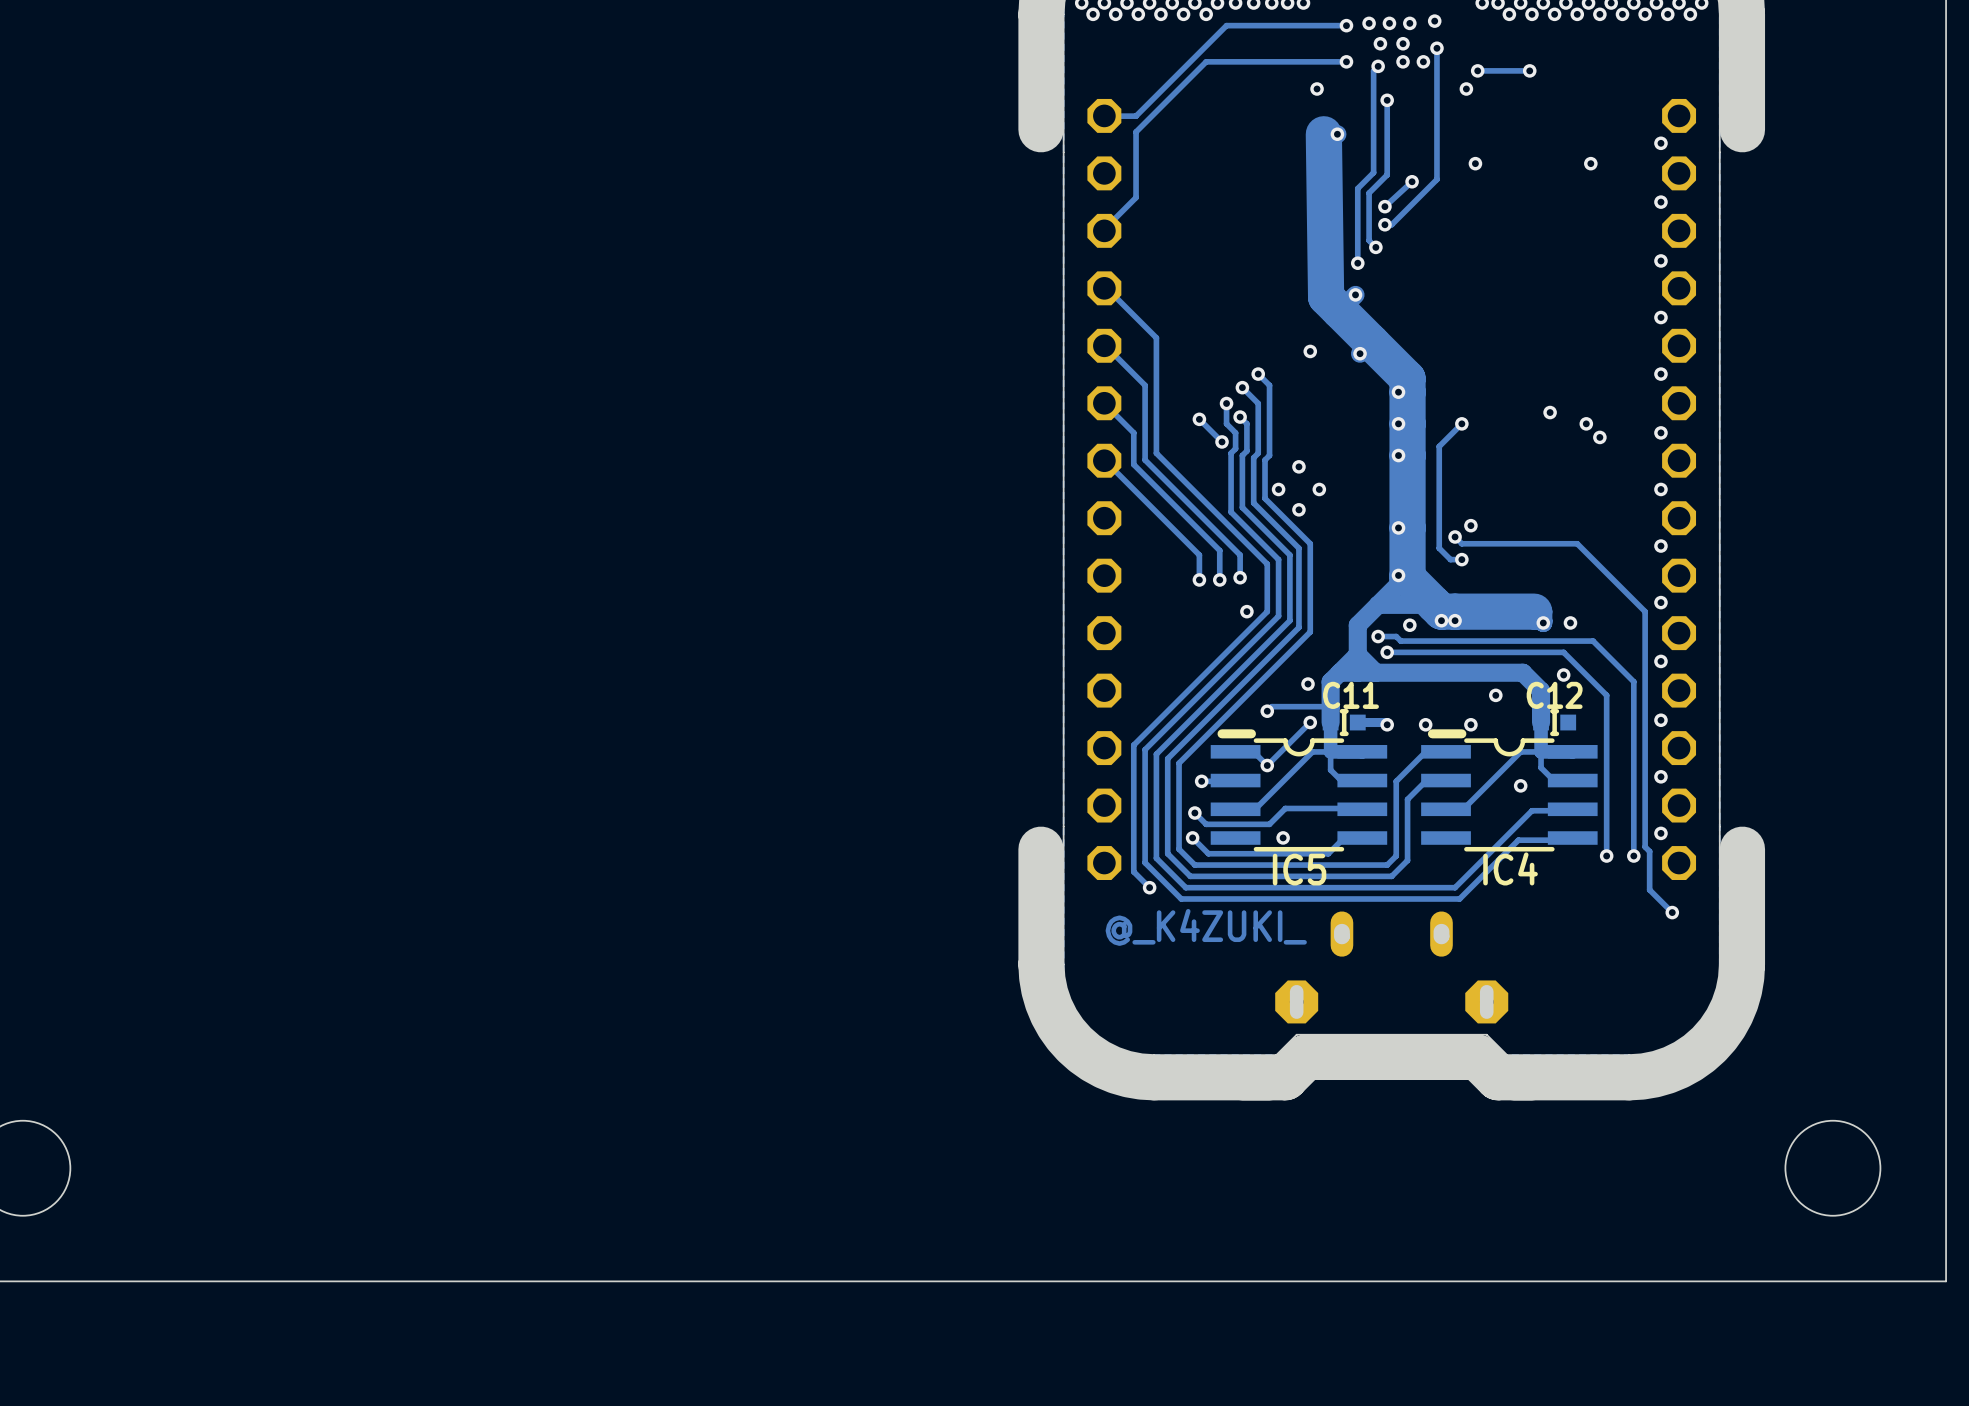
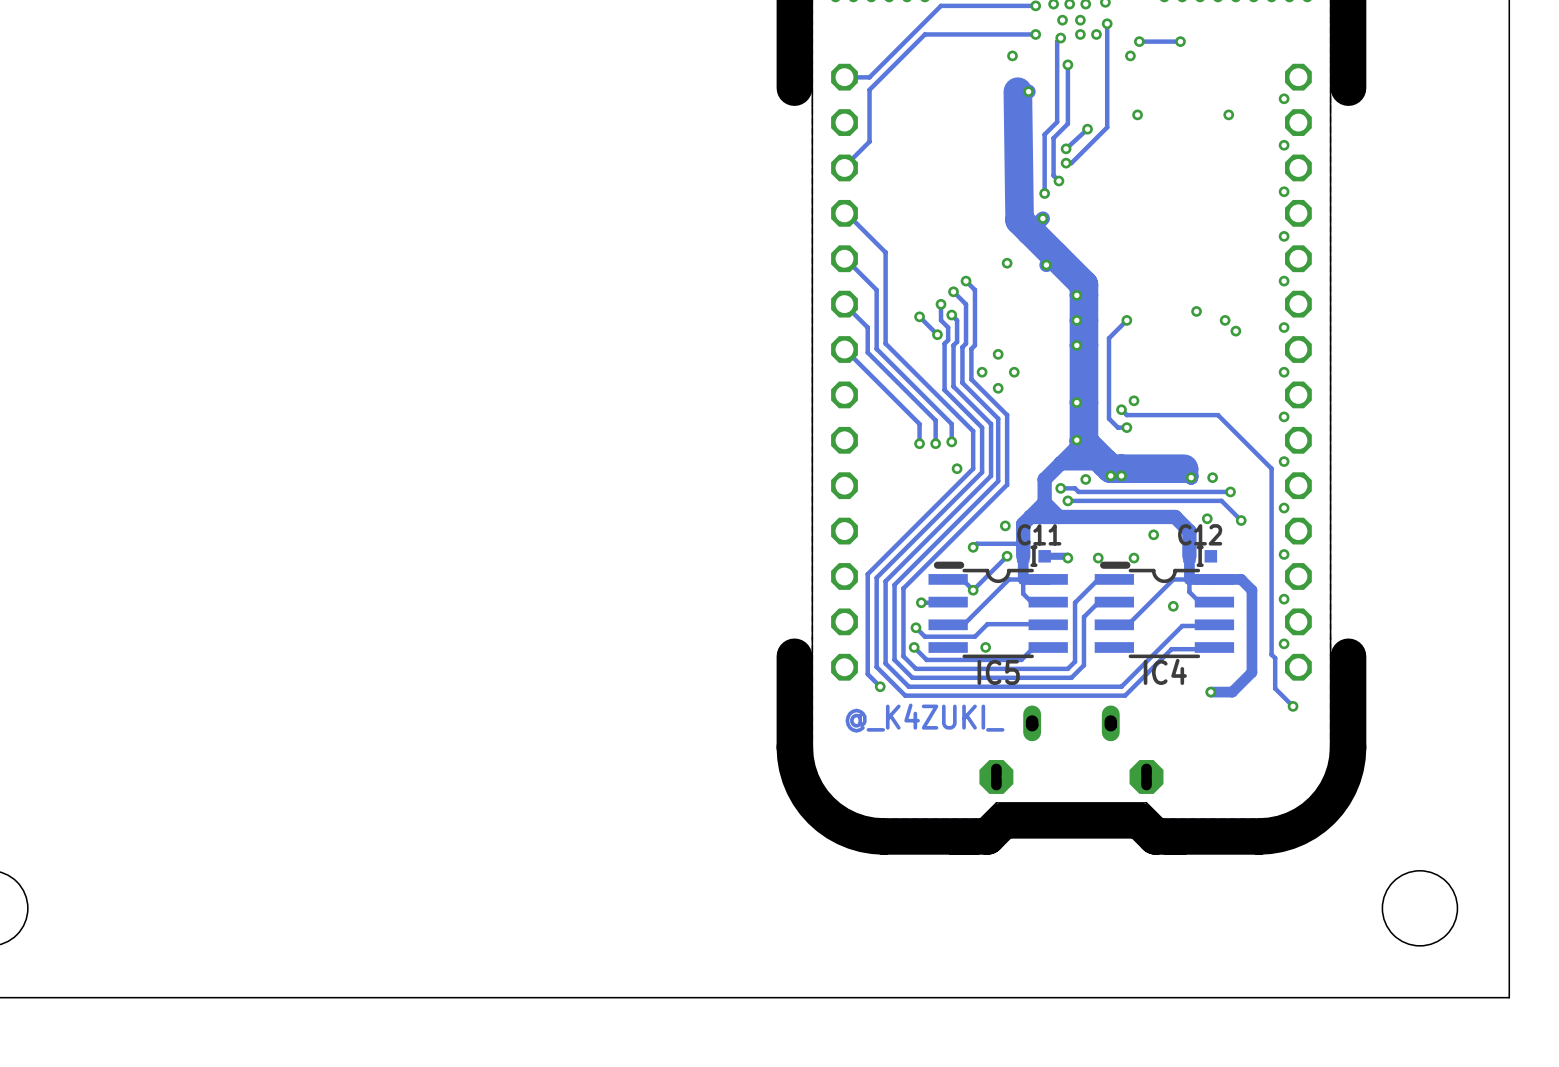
track: (1593, 641) (1633, 681) (1633, 856) -> none
via: none -> (1230, 491)
track: (1563, 652) (1606, 695) (1606, 856) -> (1207, 500) (1221, 500) (1241, 520)
via: none -> (1241, 520)
track: none -> (1214, 579) (1241, 579) (1251, 590) (1251, 672) (1232, 692) (1210, 692)
via: (1606, 856) -> none
via: (1633, 856) -> none
via: none -> (1210, 692)

